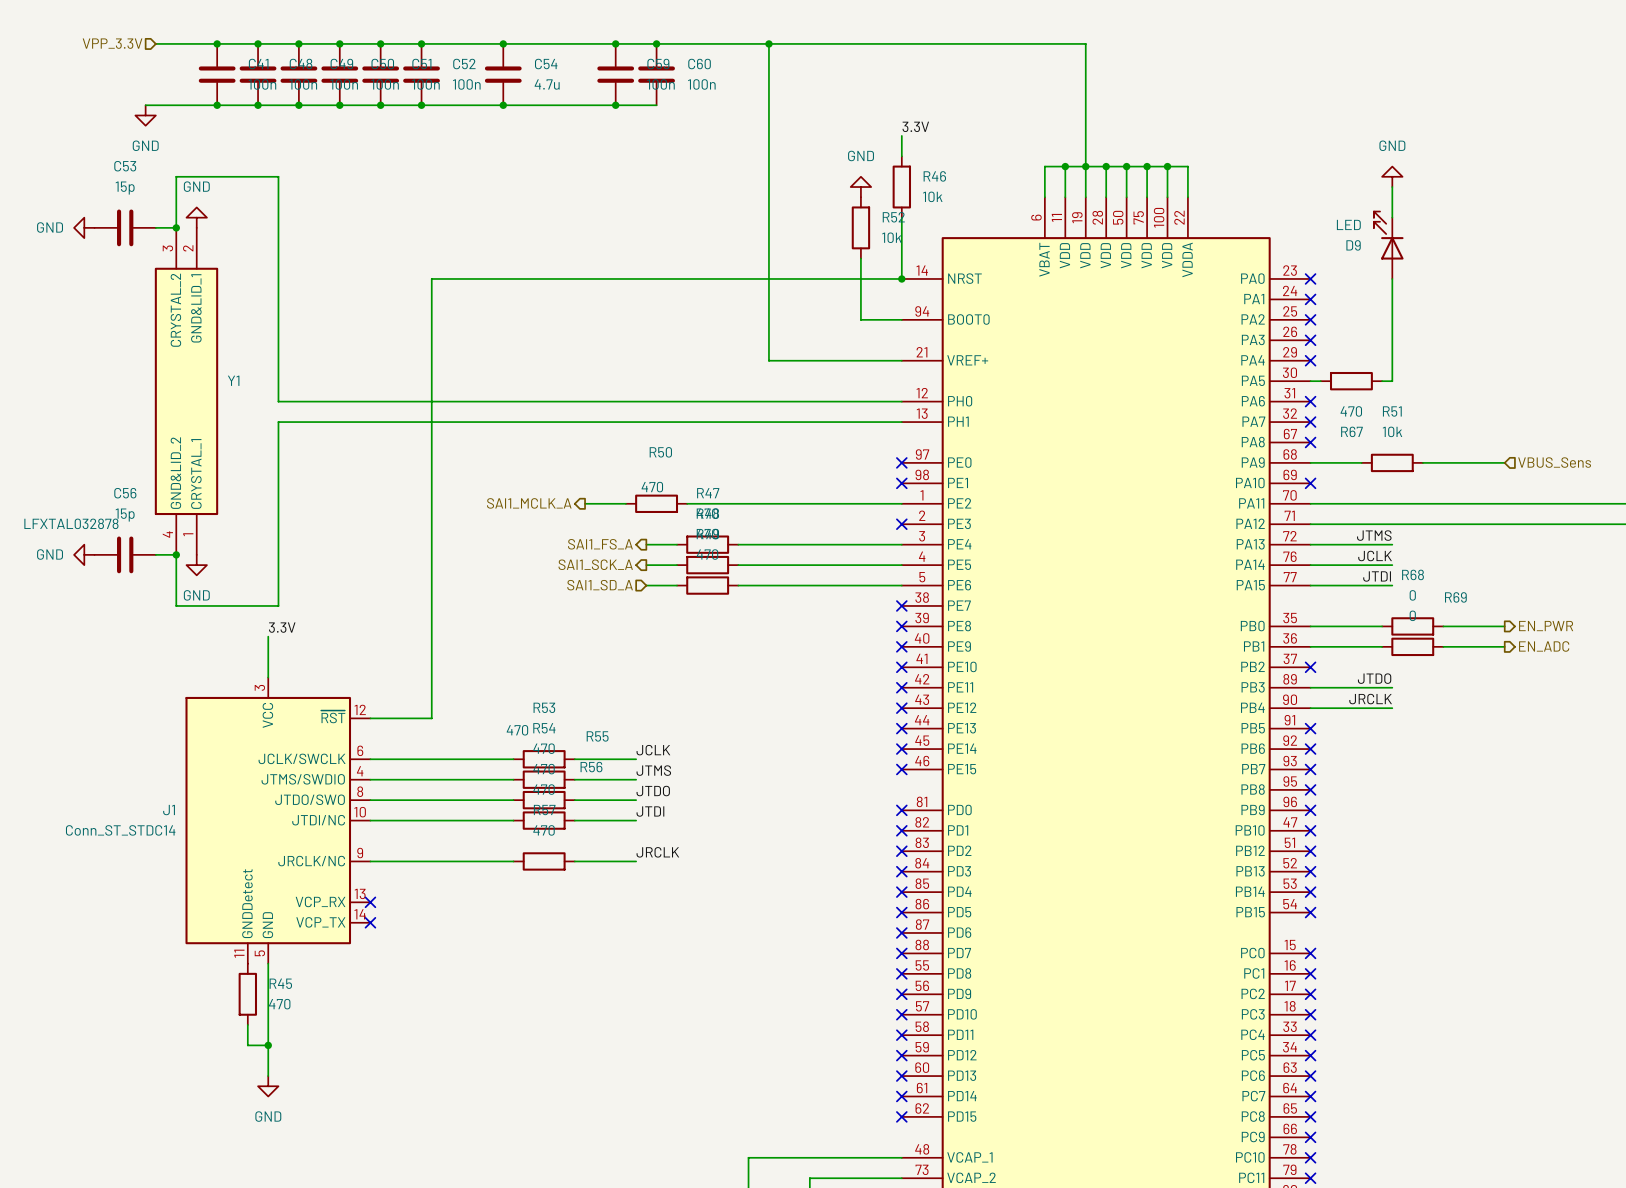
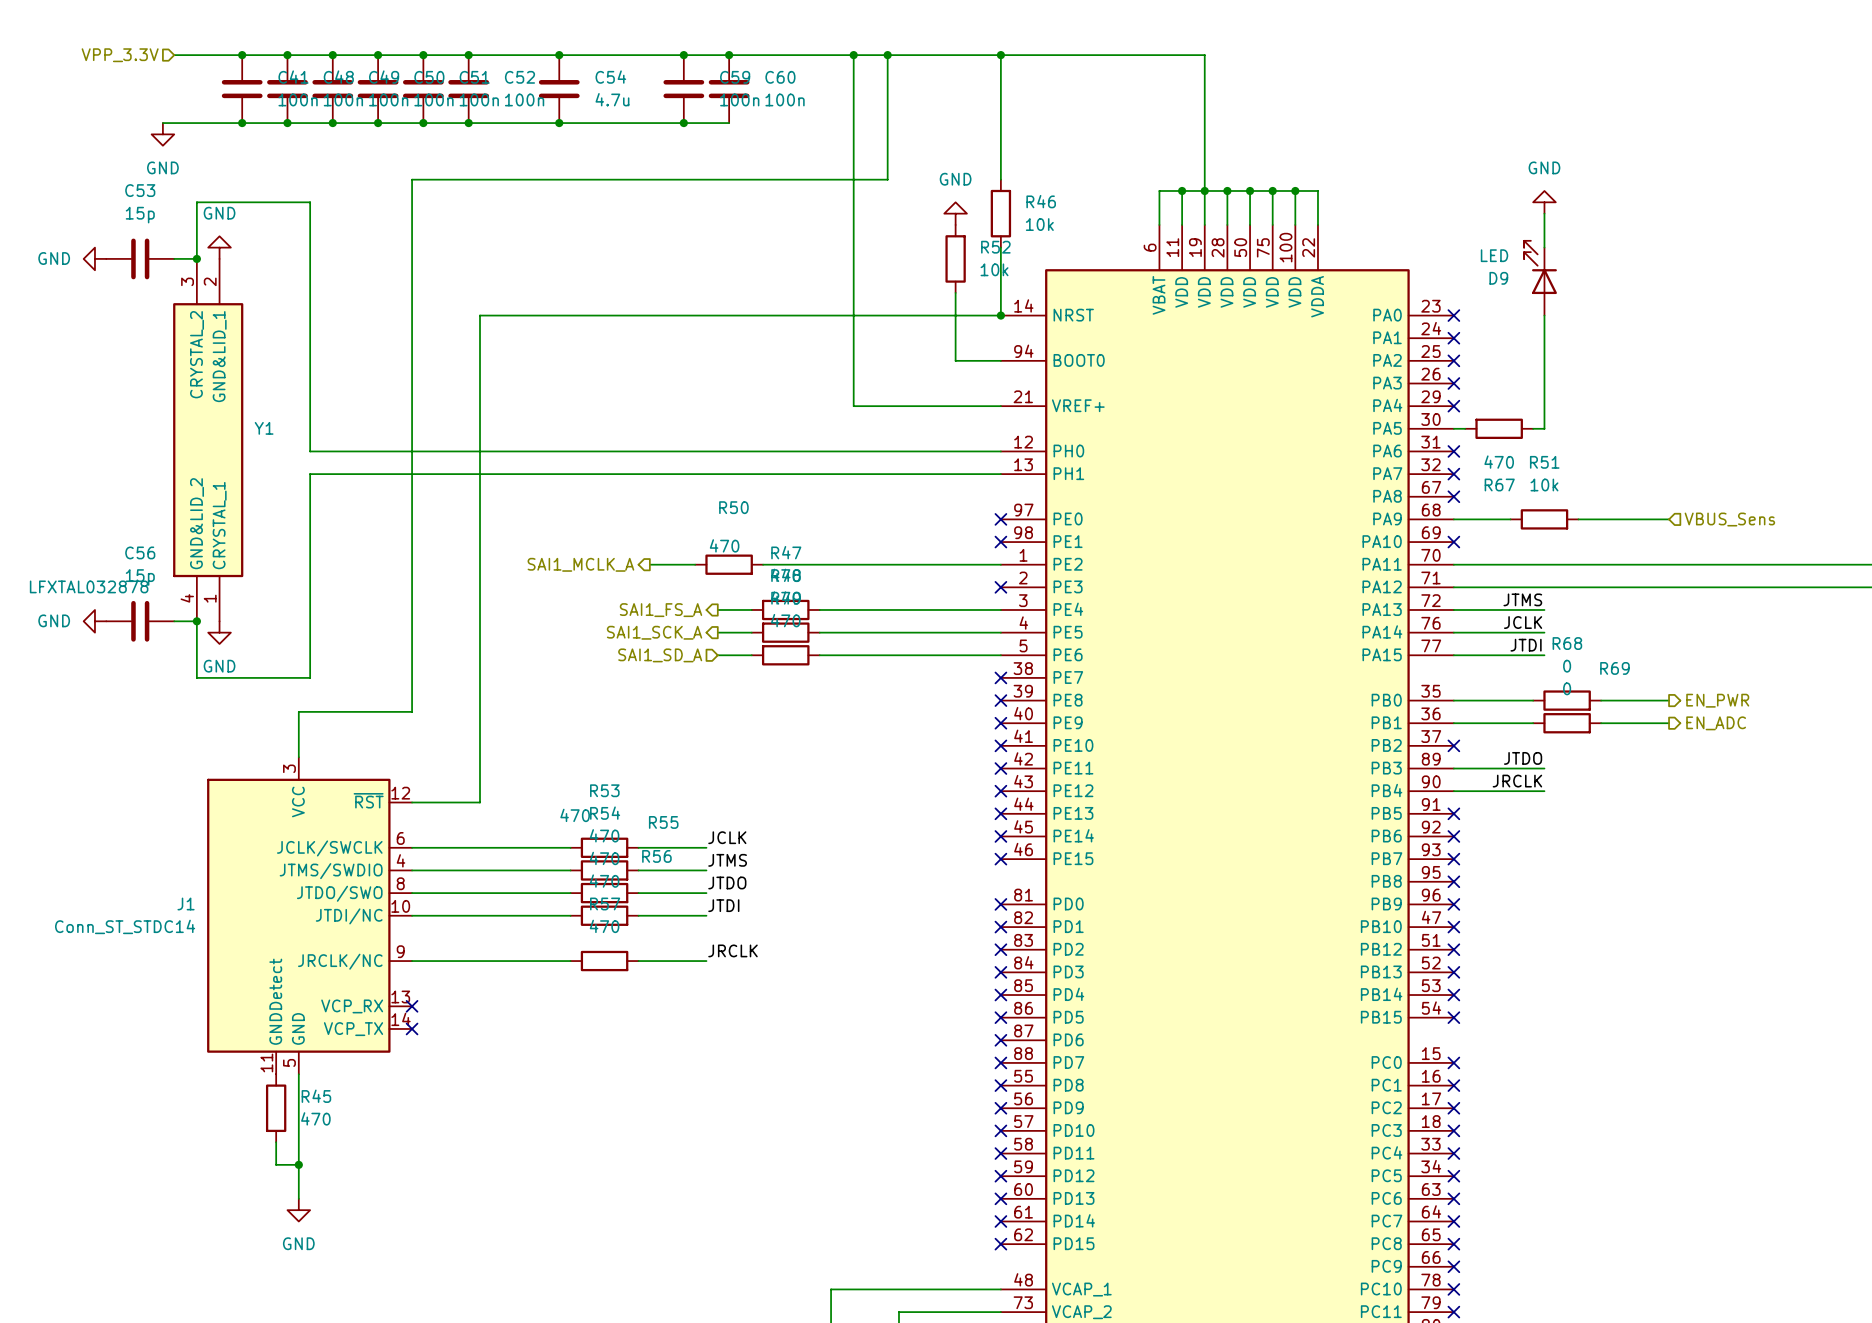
wire: none -> (887, 55) (887, 179) (412, 179) (412, 711) (298, 711)
junction: none -> (887, 55)
wire: none -> (1000, 55) (1000, 157)
junction: none -> (1000, 55)
label: 3.3V (915, 126) -> none
label: 3.3V (282, 627) -> none

